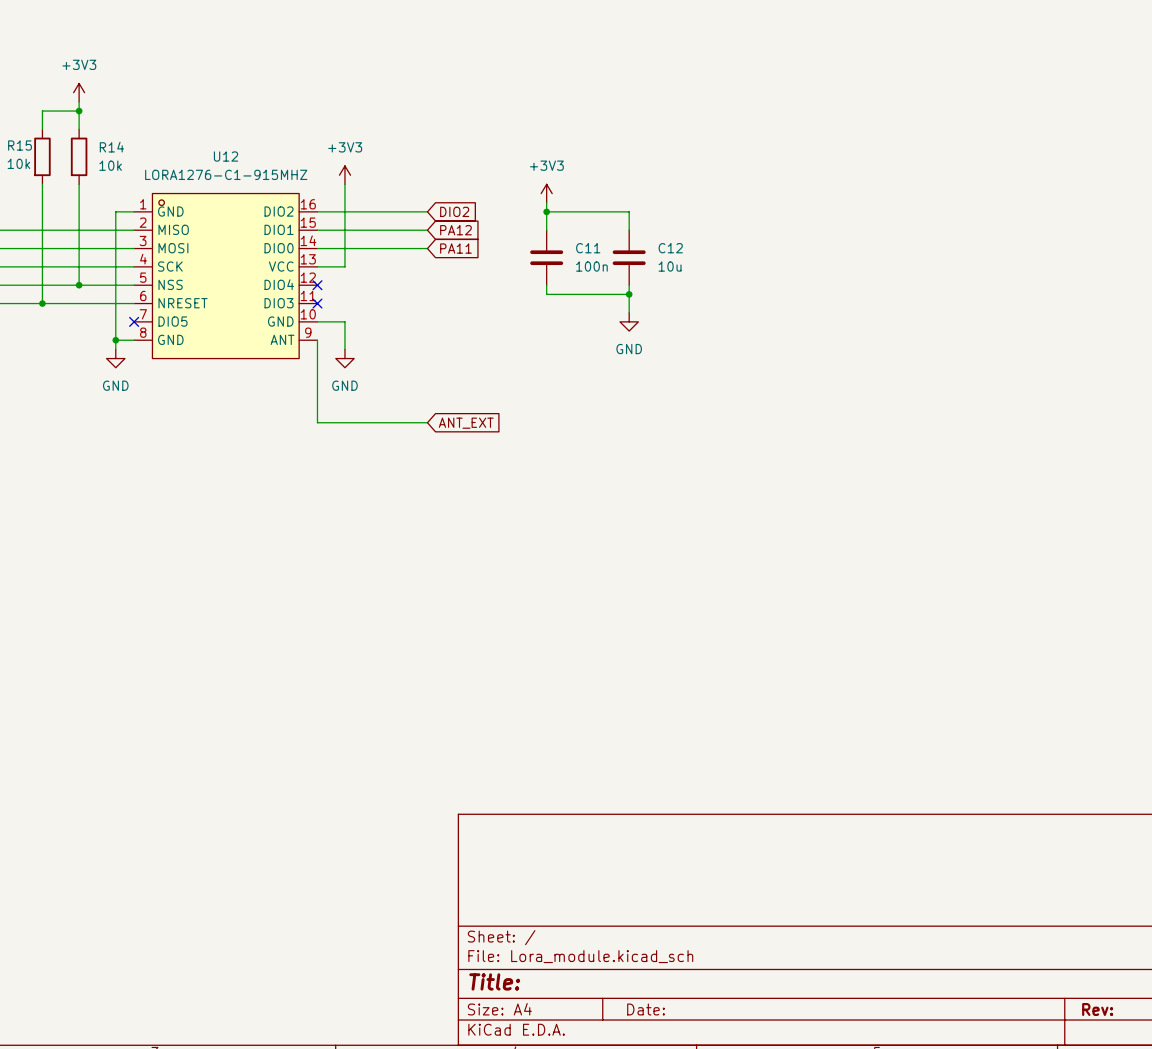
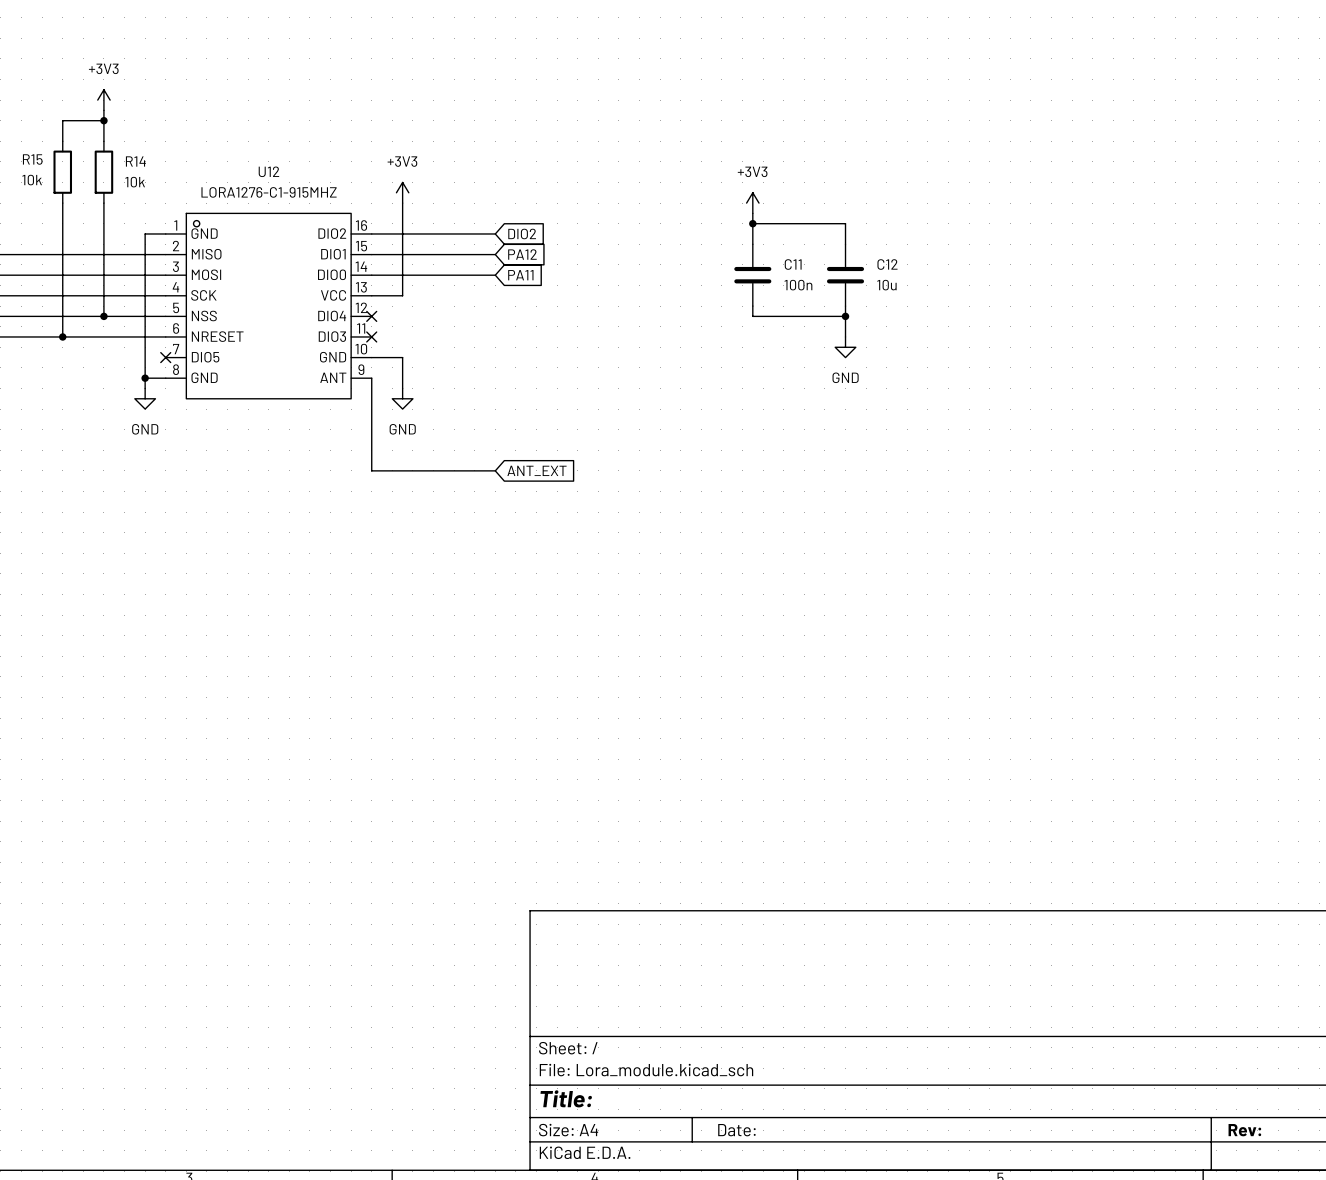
power symbol position: +3V3 (546, 193) -> +3V3 (752, 203)
wire: (546, 202) (546, 230) -> (752, 213) (752, 244)
junction: none -> (752, 223)
wire: (546, 211) (629, 211) (629, 230) -> (752, 223) (845, 223) (845, 244)
junction: (546, 211) -> none
C11 position: (546, 257) -> (752, 275)
C12 position: (629, 257) -> (845, 275)
wire: (546, 285) (546, 294) (629, 294) -> (752, 306) (752, 316) (845, 316)
wire: (629, 285) (629, 312) -> (845, 306) (845, 336)
junction: none -> (845, 316)
junction: (629, 294) -> none
power symbol position: GND (629, 321) -> GND (845, 347)

